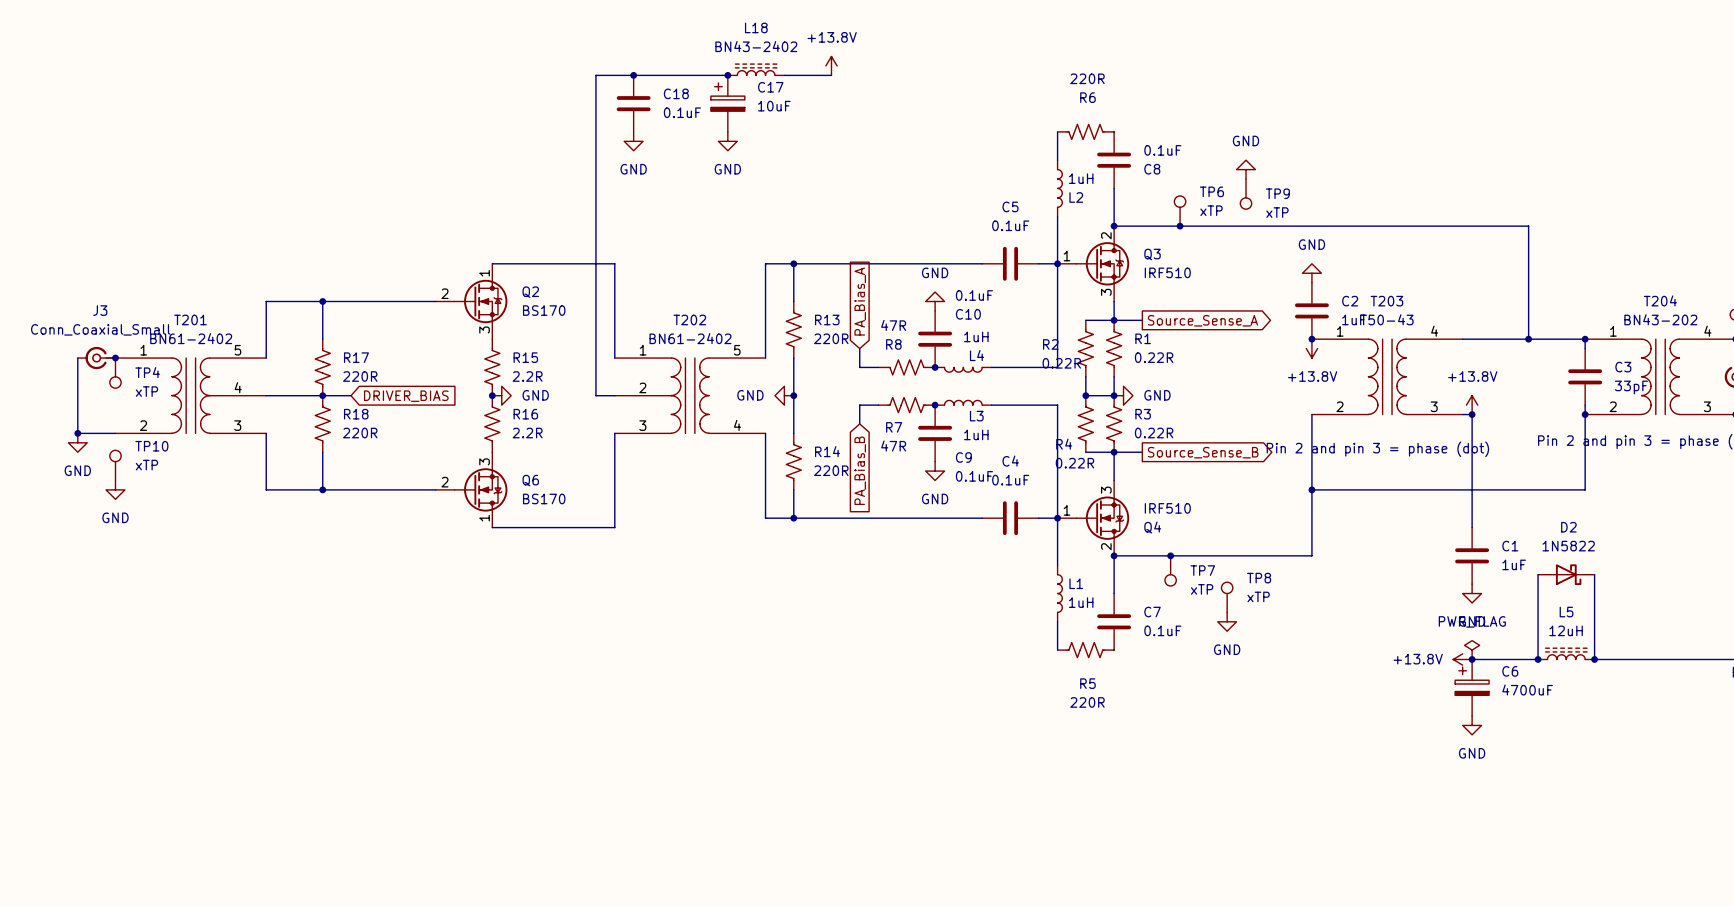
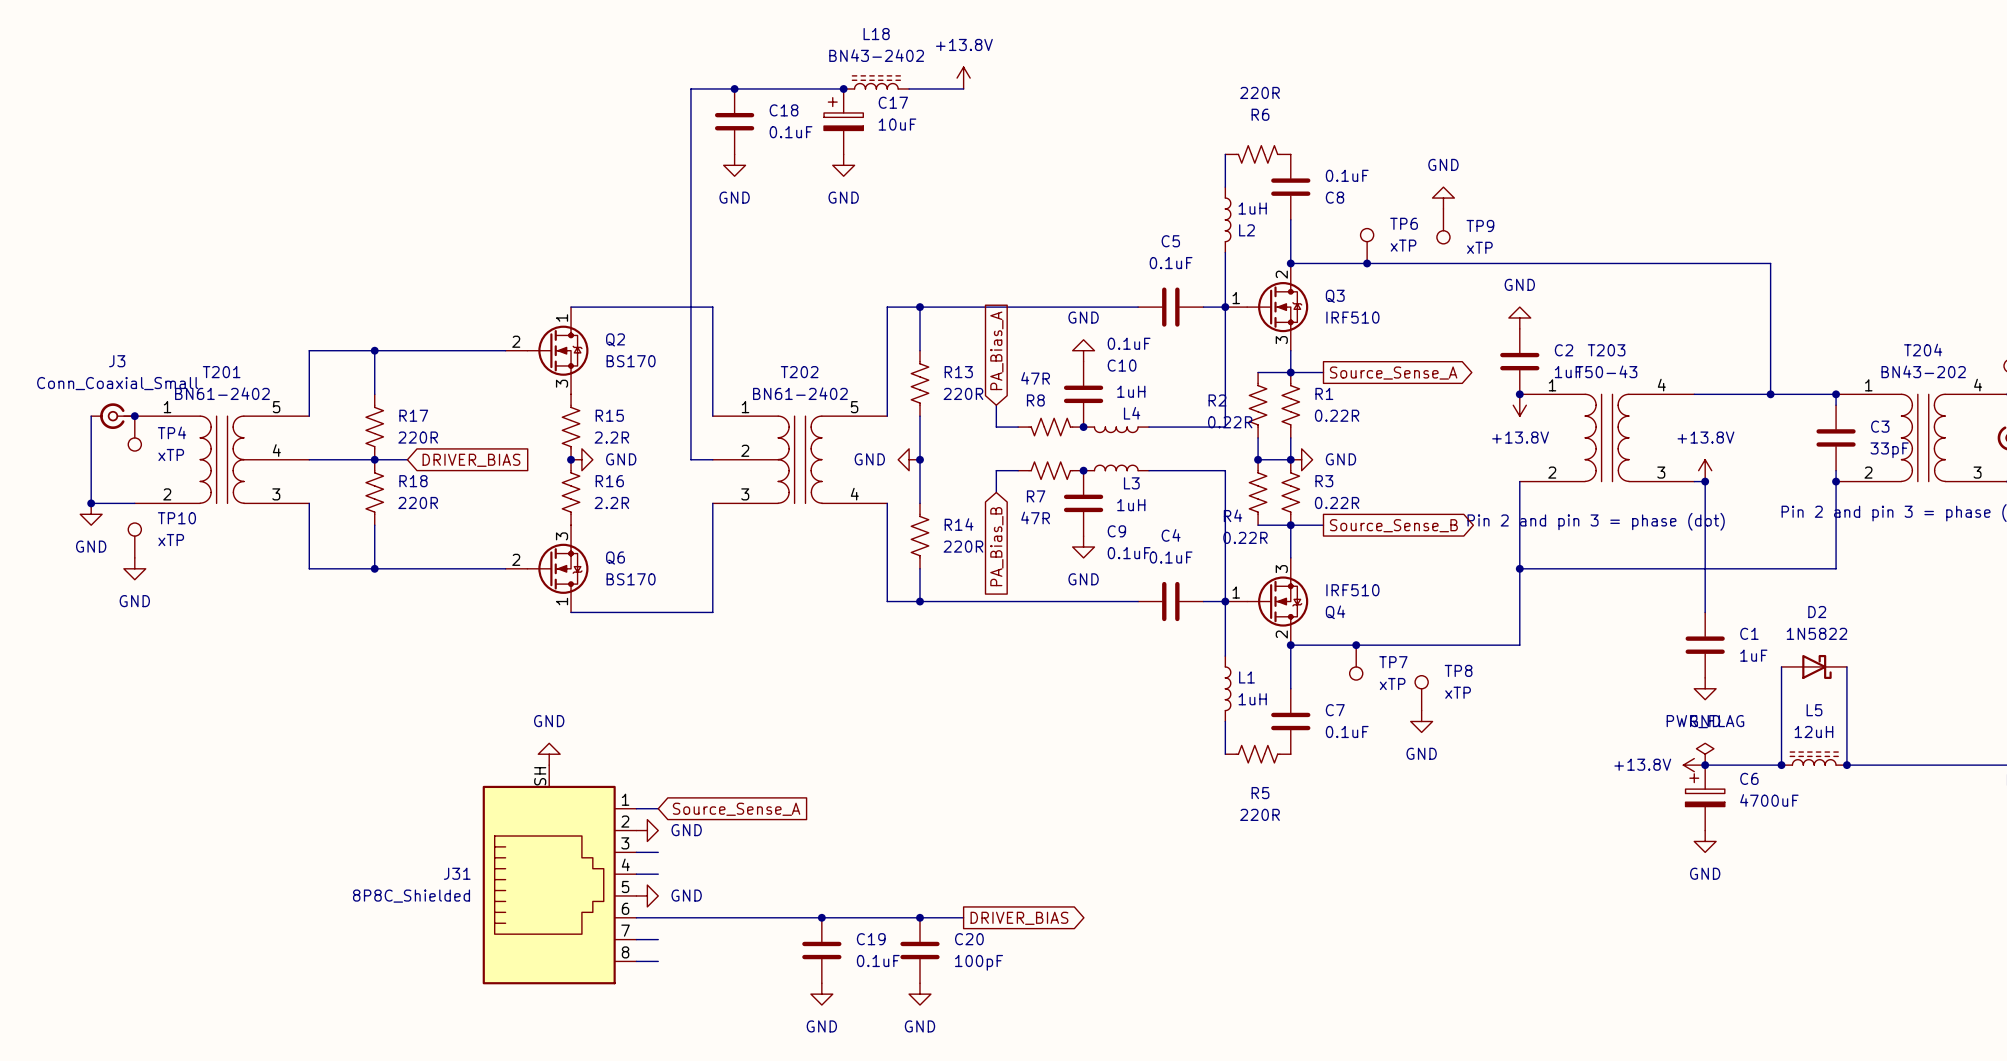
power symbol: none -> GND (549, 754)
wire: none -> (636, 808) (658, 808)
global label: none -> Source_Sense_A (736, 809)
power symbol: none -> GND (647, 830)
wire: none -> (636, 852) (658, 852)
wire: none -> (636, 874) (658, 874)
J31: none -> 8P8C_Shielded (559, 874)
power symbol: none -> GND (647, 895)
wire: none -> (636, 917) (963, 917)
junction: none -> (821, 917)
junction: none -> (919, 917)
global label: none -> DRIVER_BIAS (1019, 918)
wire: none -> (636, 939) (658, 939)
C19: none -> 0.1uF (821, 950)
C20: none -> 100pF (919, 950)
wire: none -> (636, 961) (658, 961)
power symbol: none -> GND (821, 994)
power symbol: none -> GND (919, 994)

